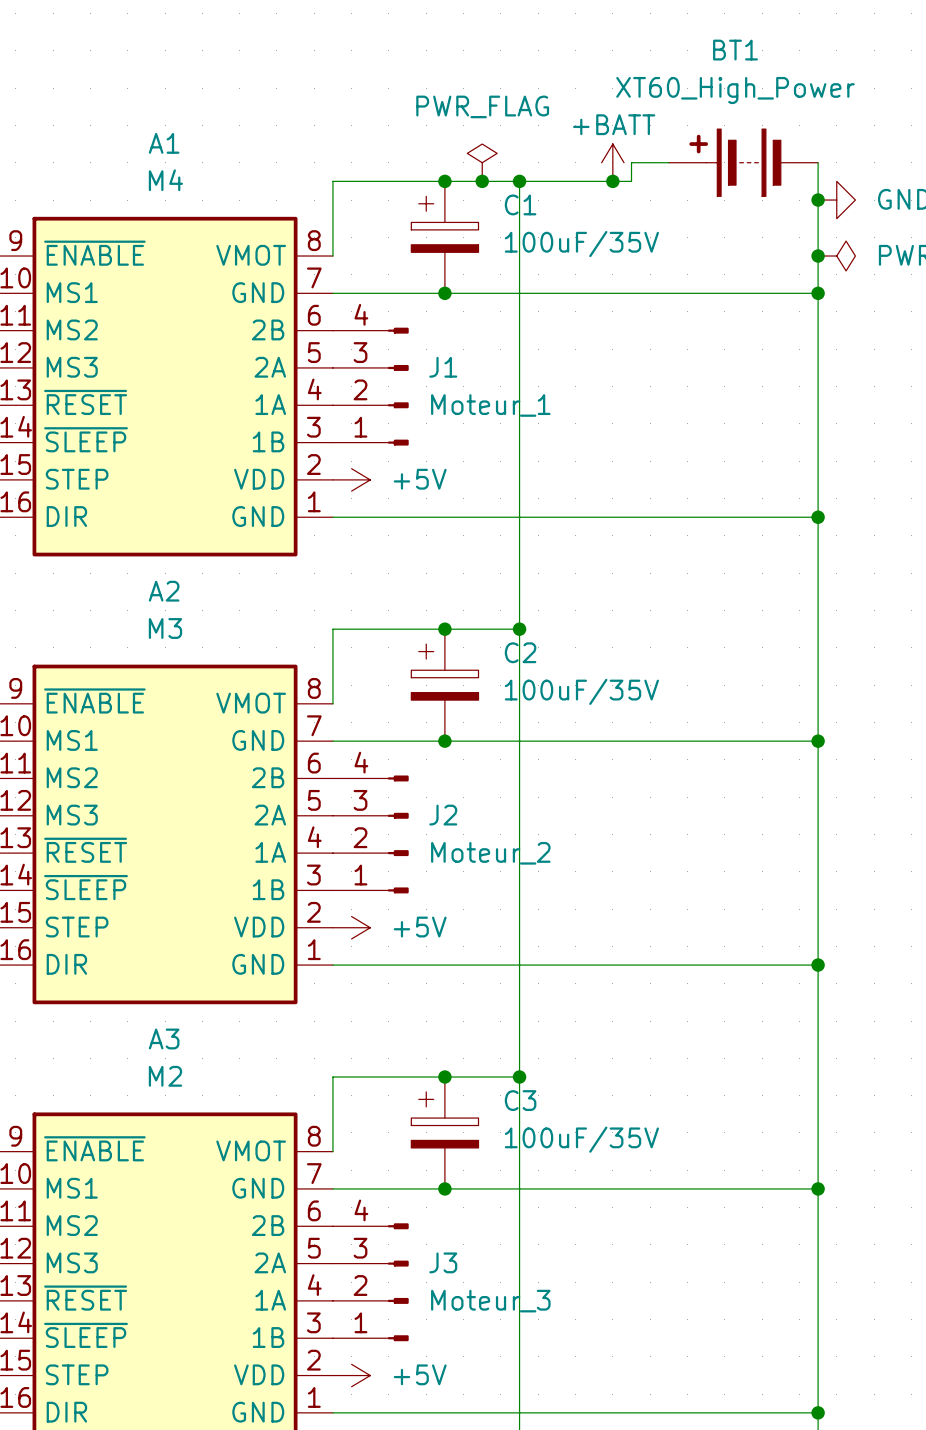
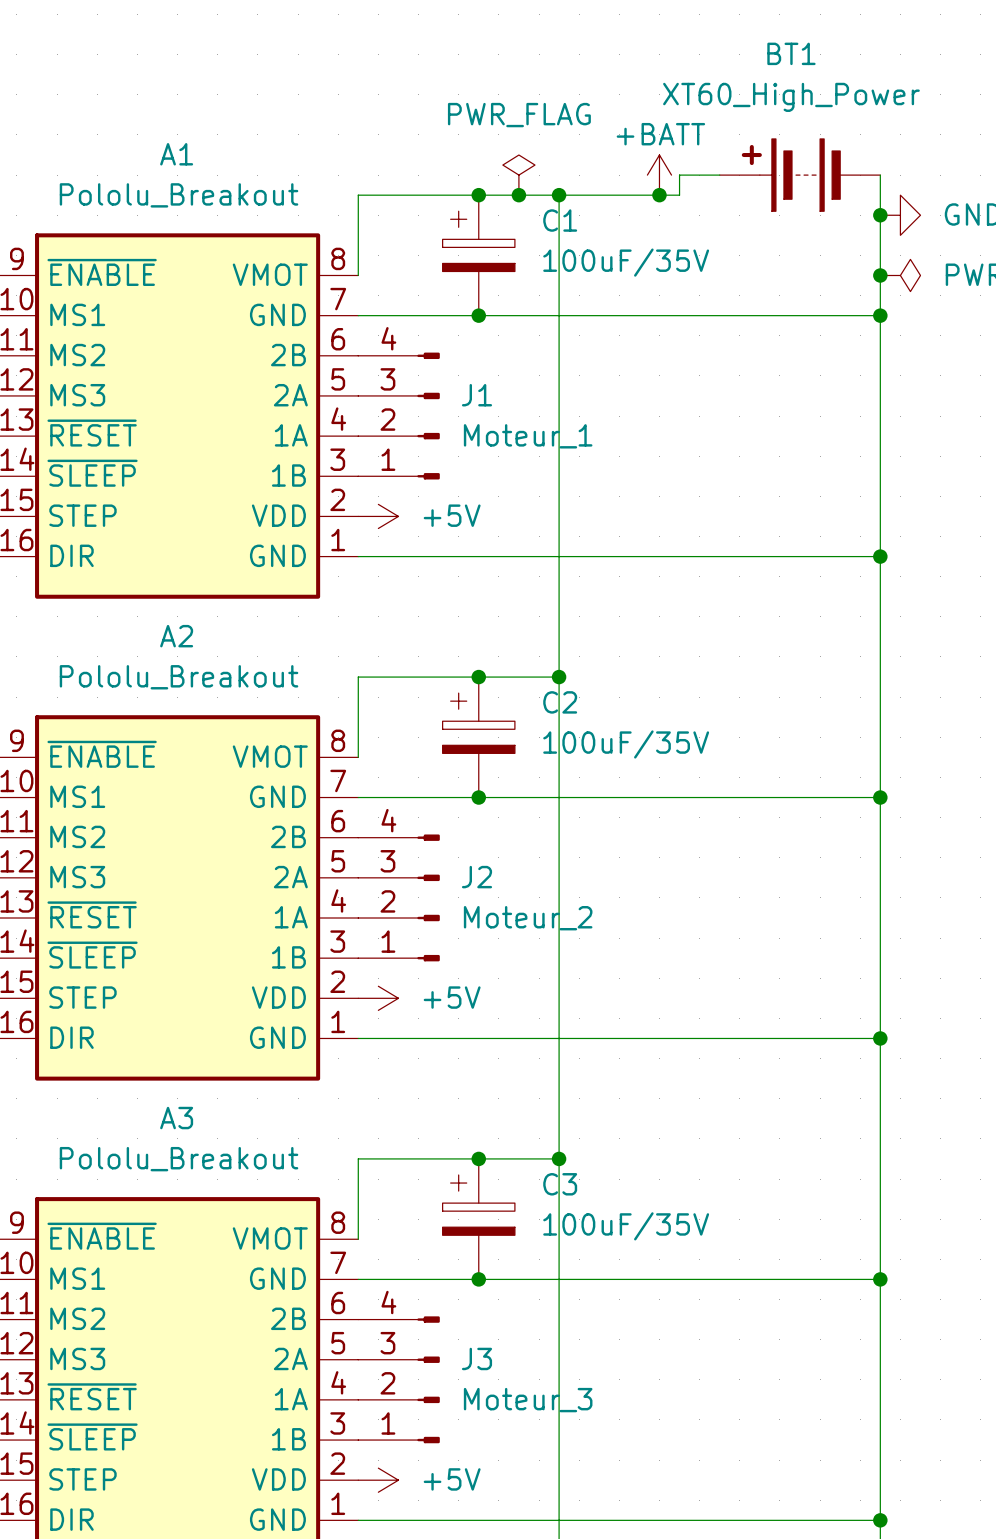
A1 value: M4 (165, 180) -> Pololu_Breakout (179, 195)
A2 value: M3 (165, 628) -> Pololu_Breakout (179, 677)
A3 value: M2 (165, 1076) -> Pololu_Breakout (179, 1159)

